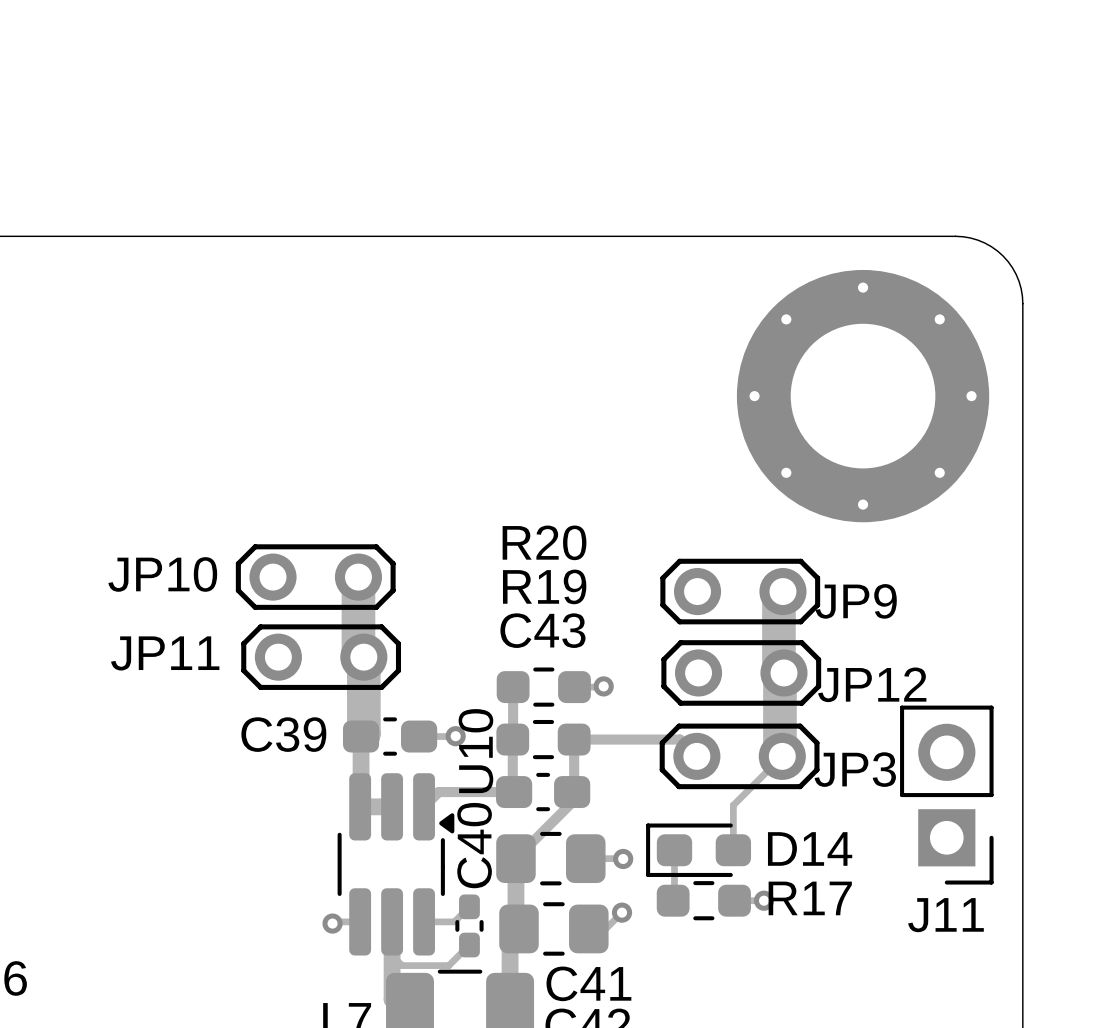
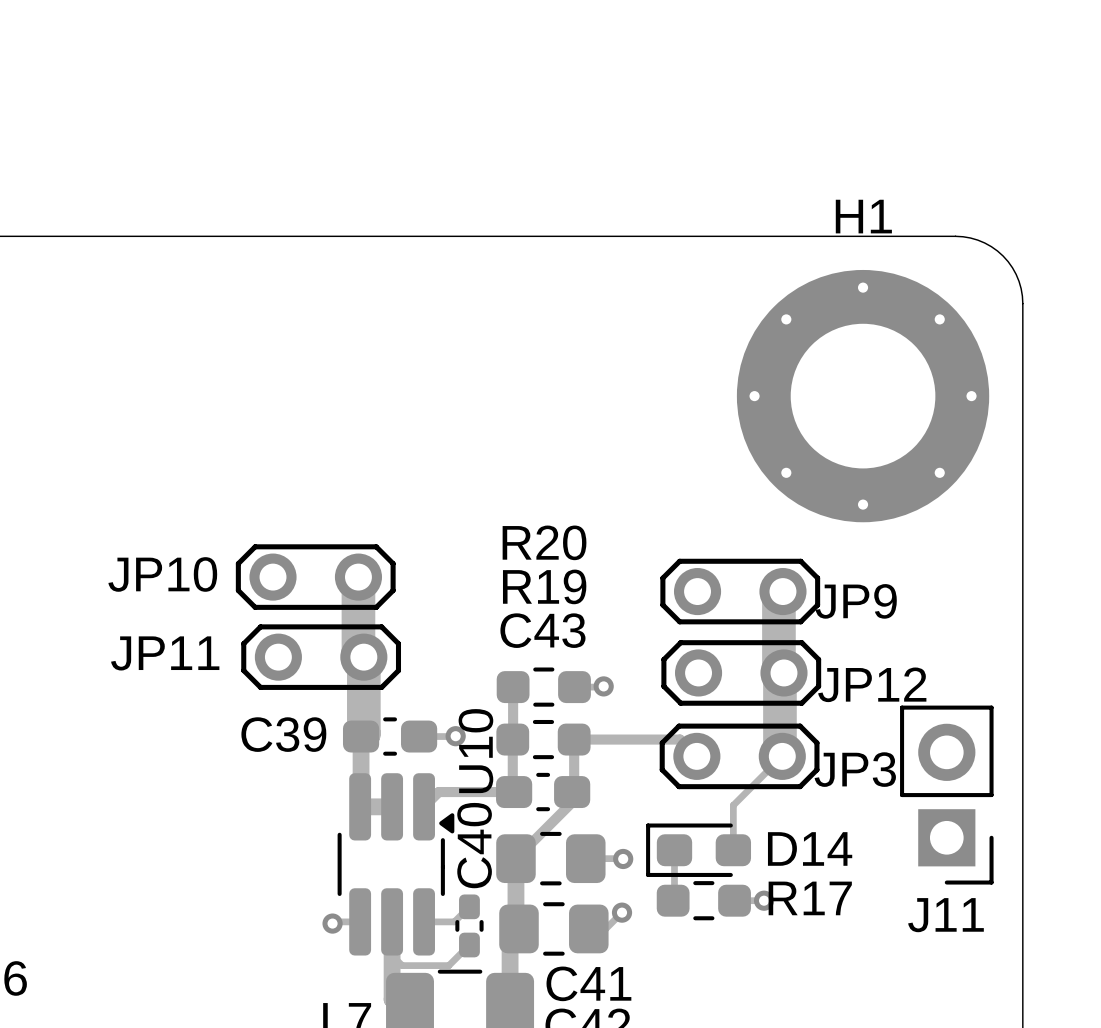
H1 name: none -> H1 (863, 216)

